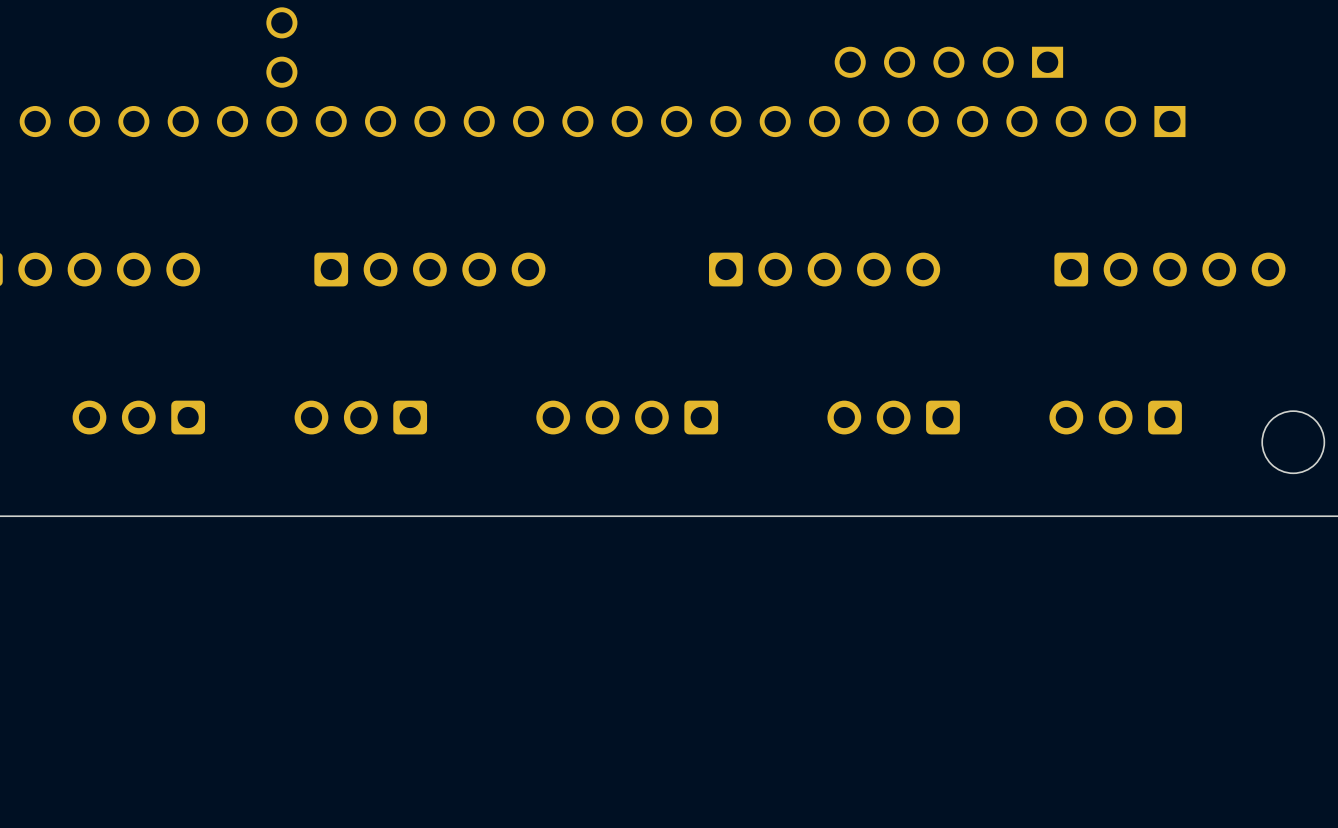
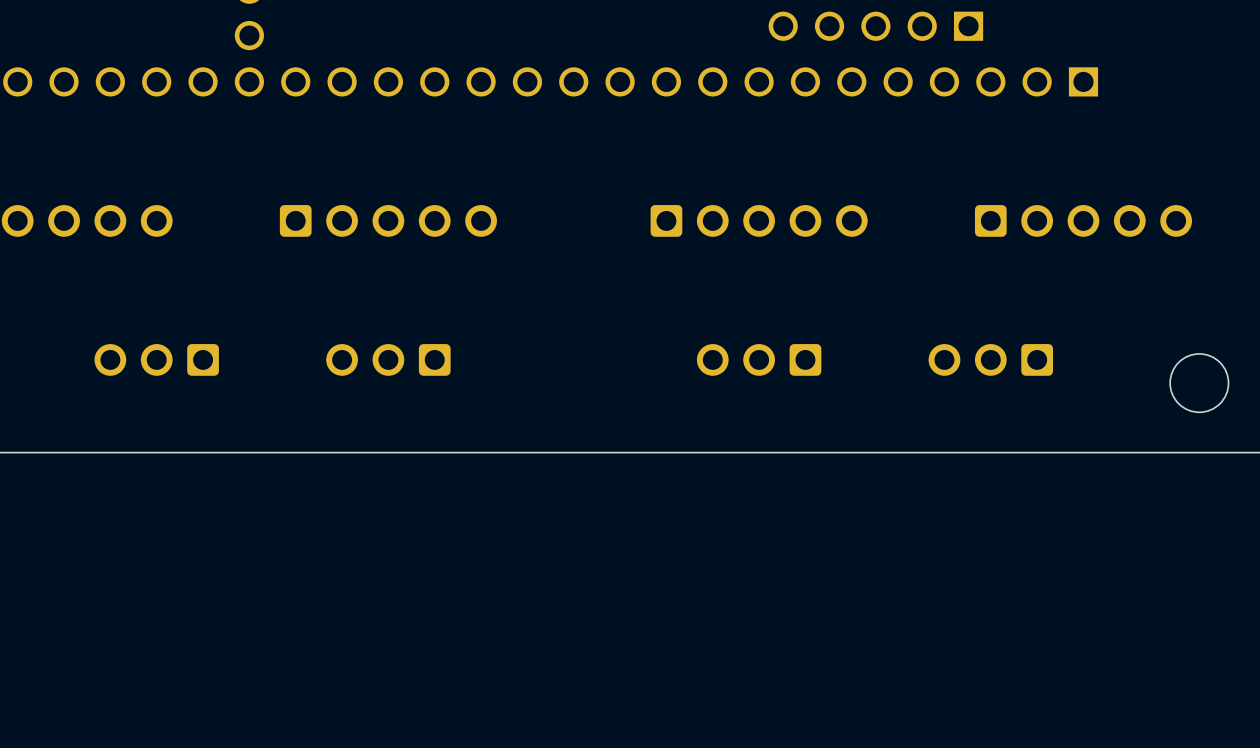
part position: (138, 417) -> (156, 359)
part position: (360, 417) -> (388, 359)
part: (627, 417) -> none
part position: (893, 417) -> (759, 359)
part position: (1115, 417) -> (990, 359)

